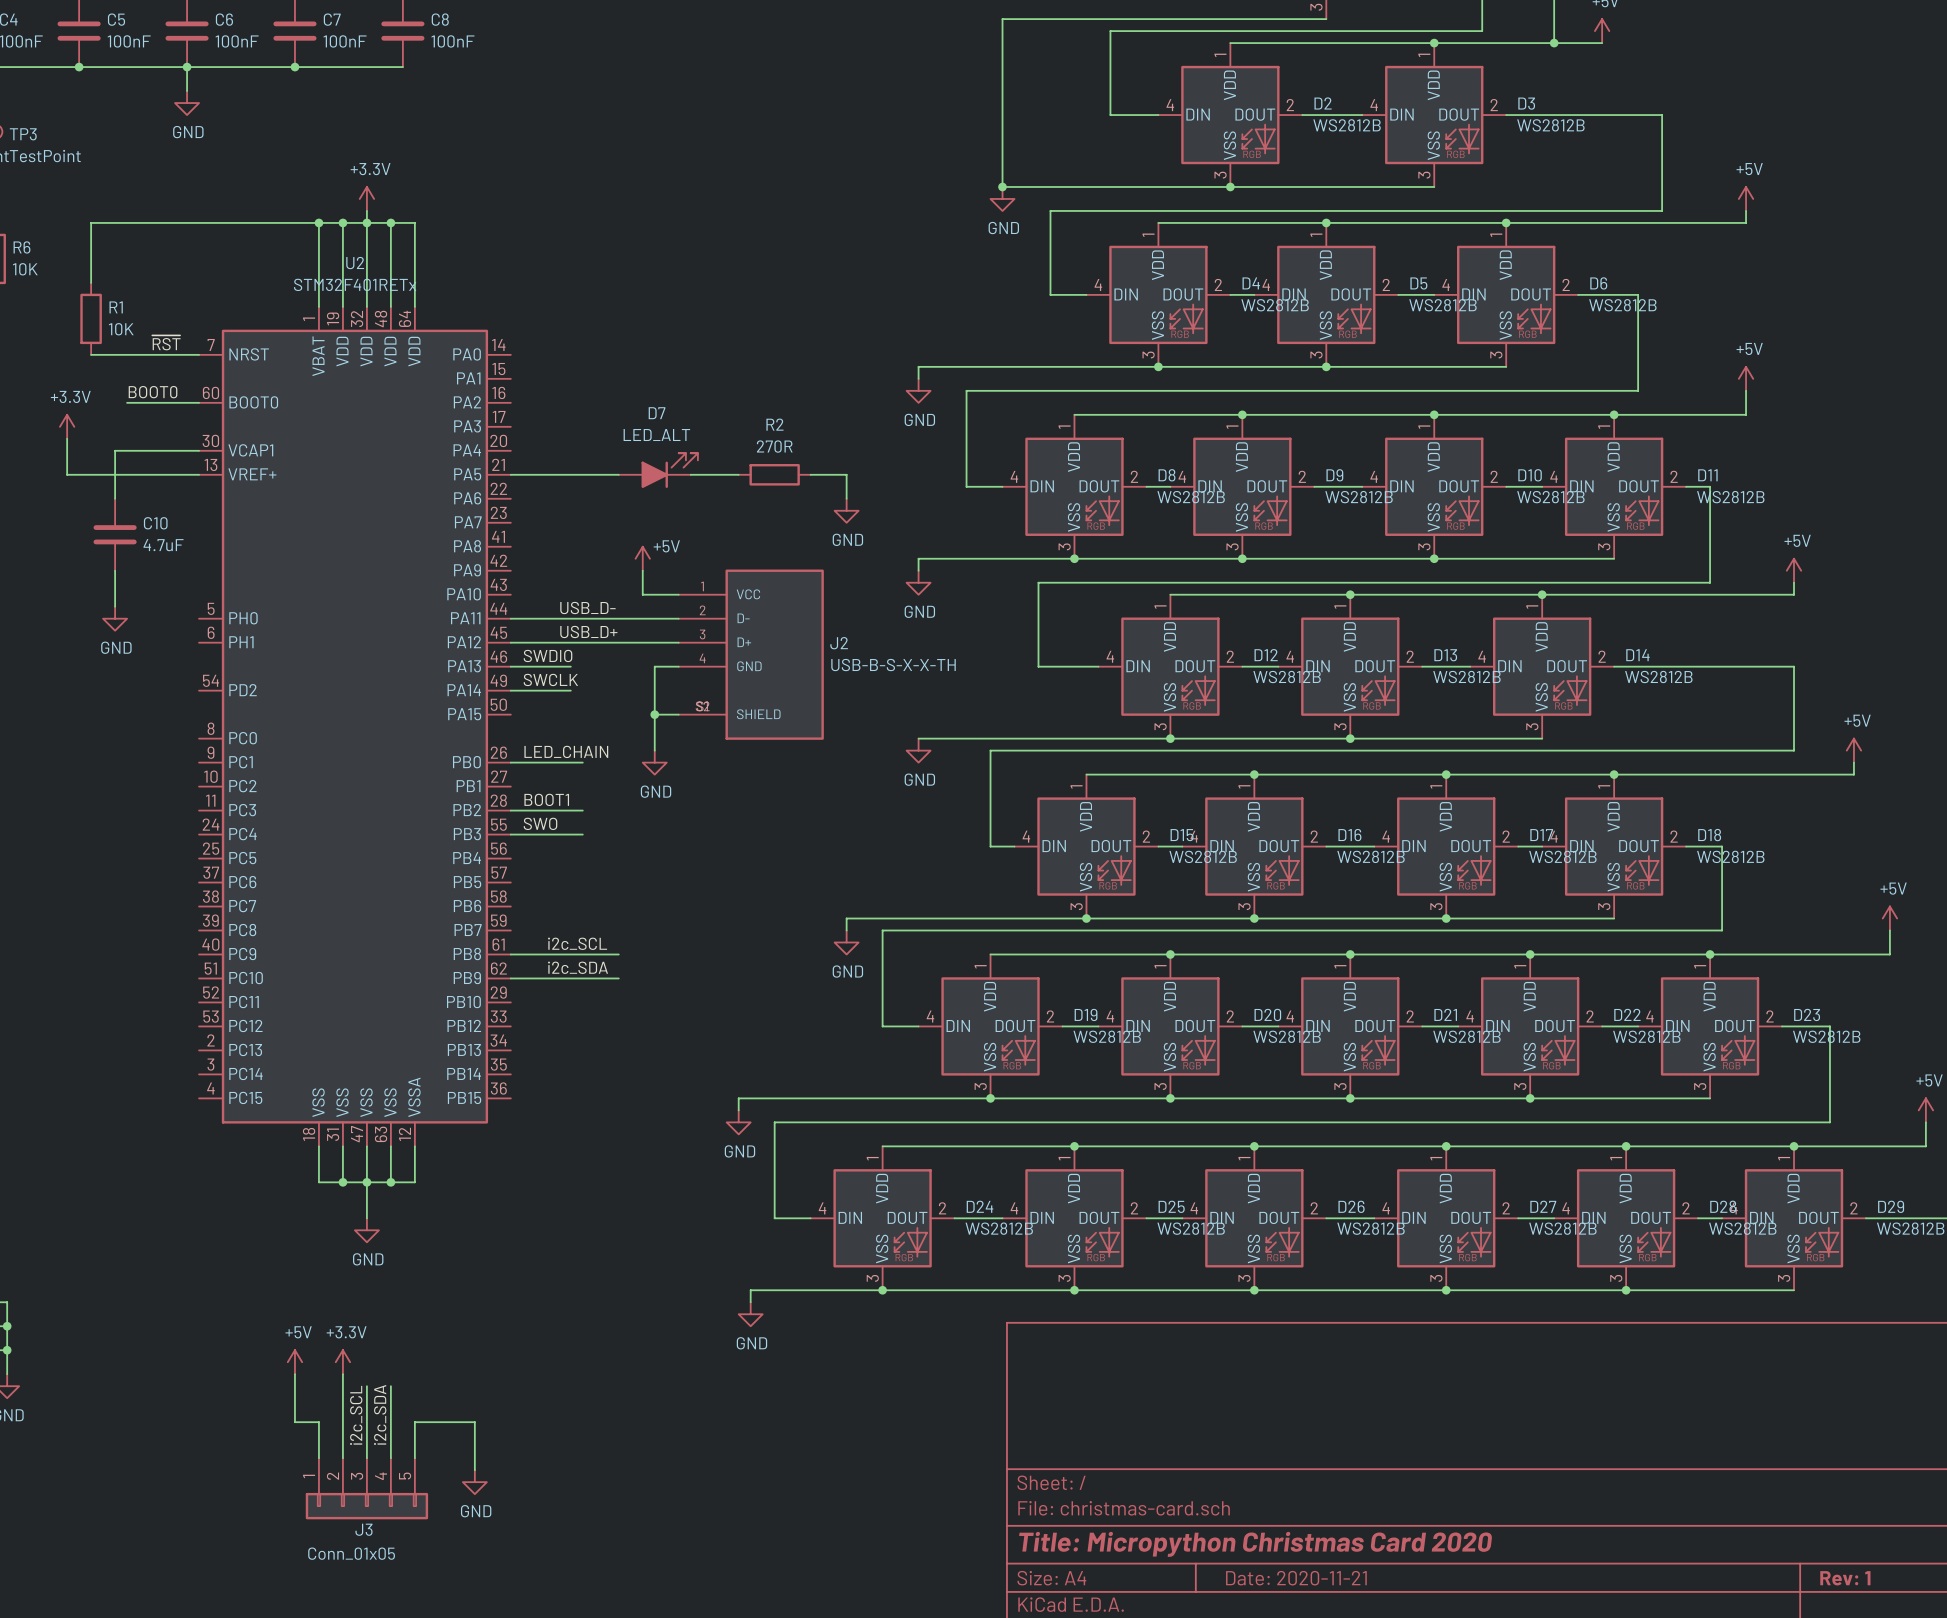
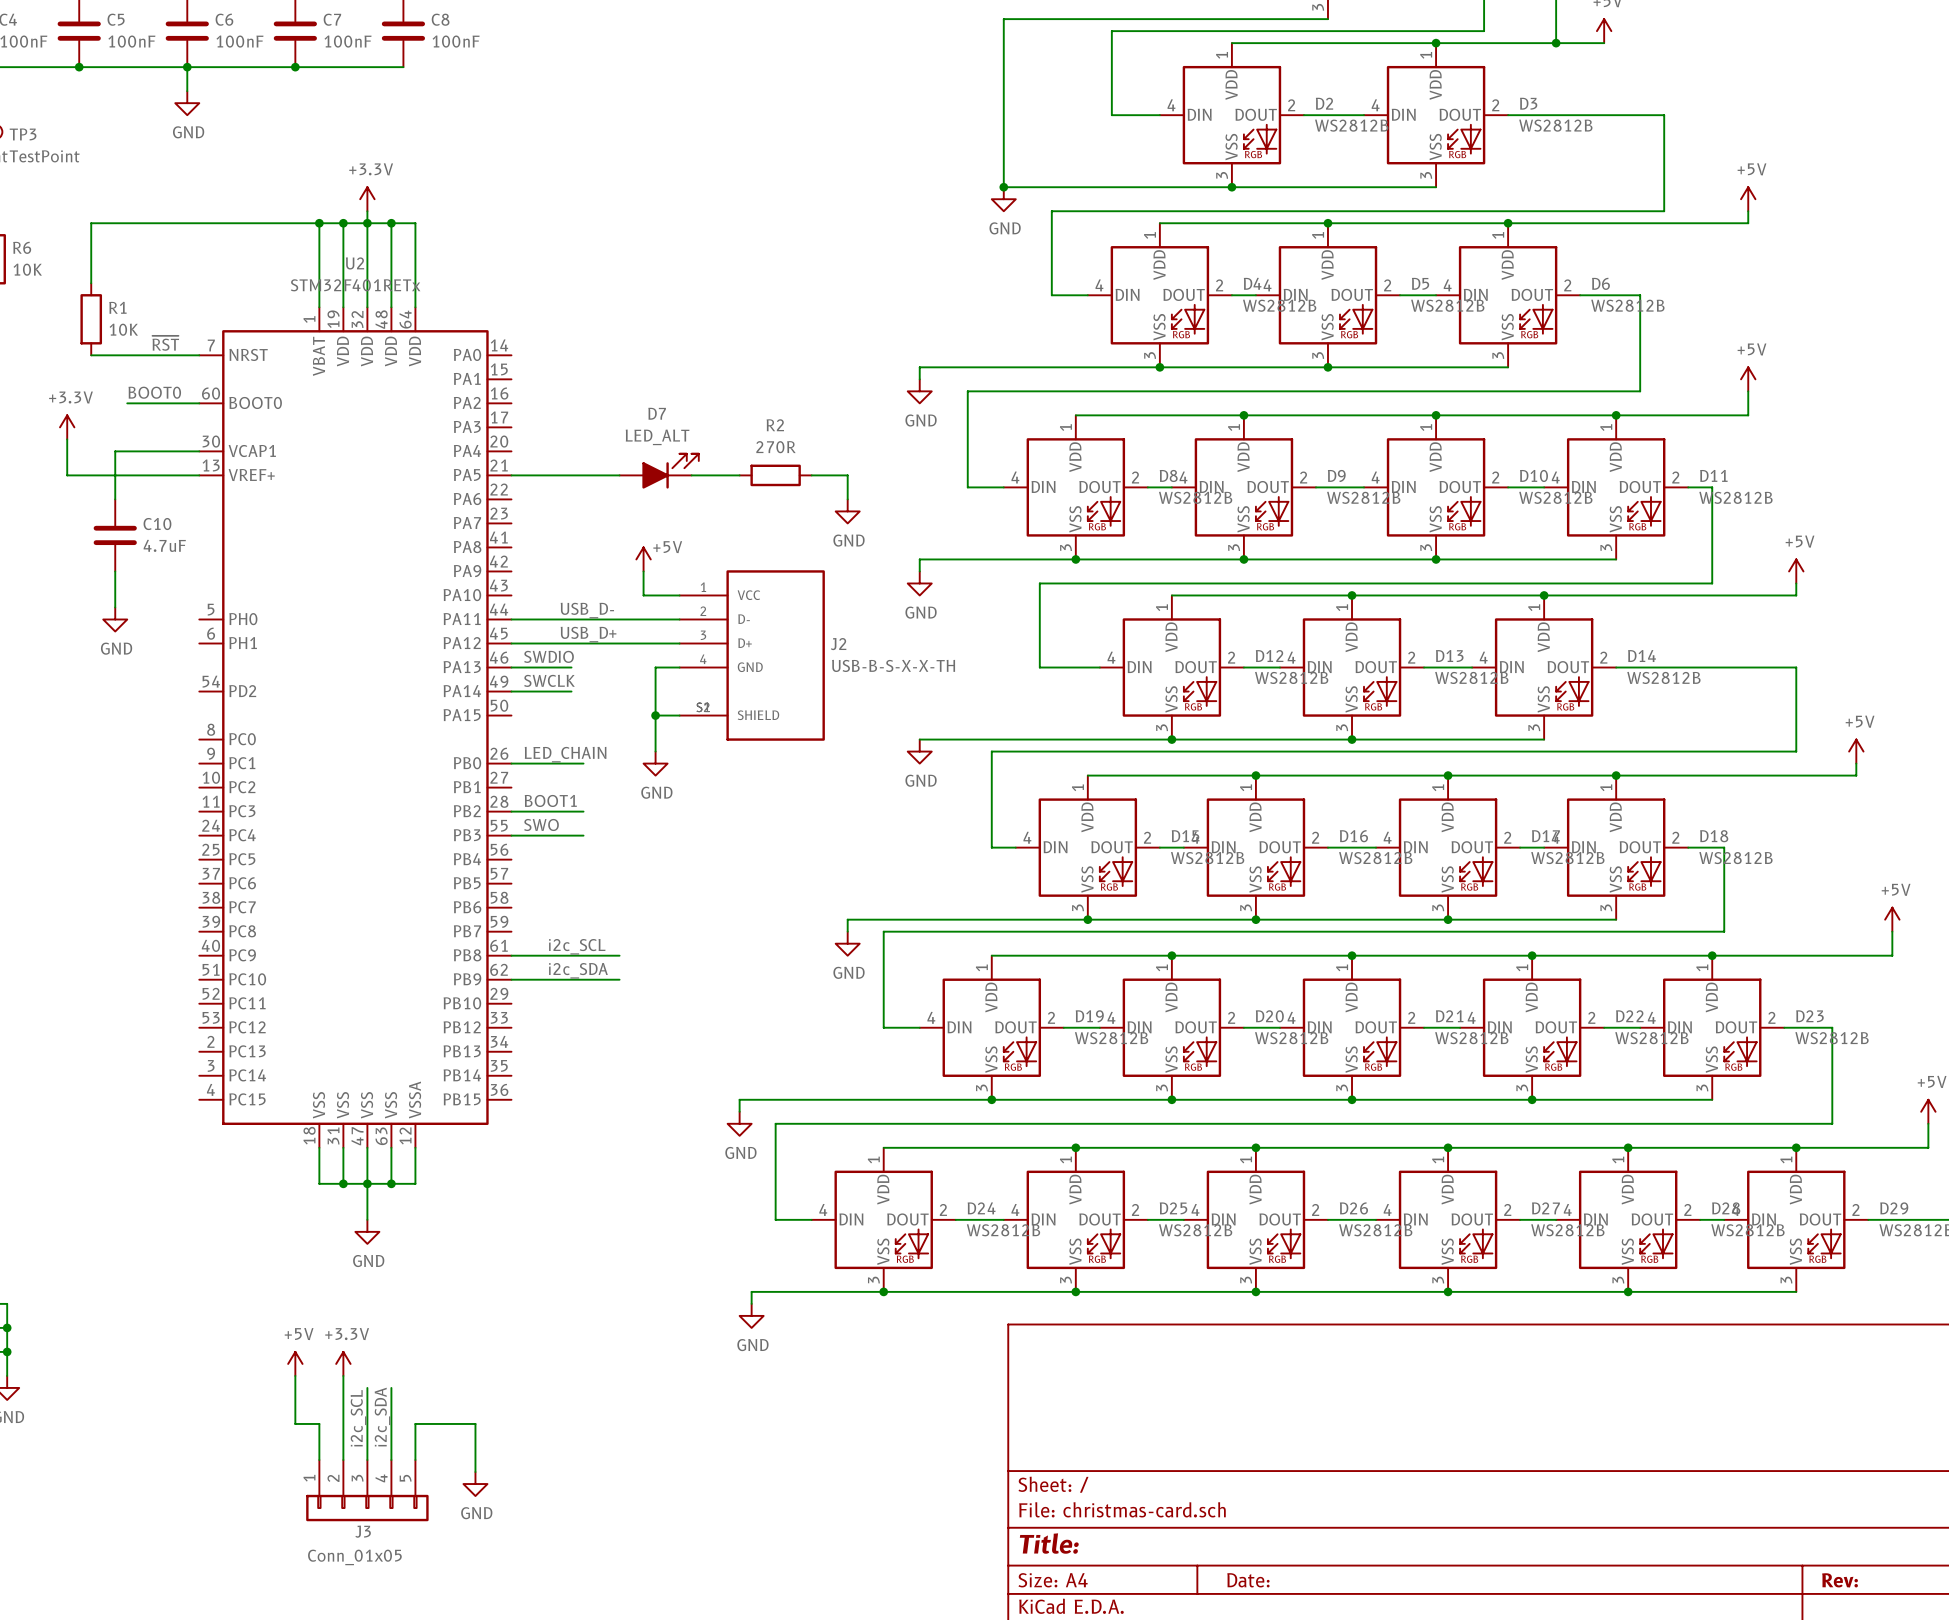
title block: Title: Micropython Christmas Card 2020 (1255, 1544) -> Title: (1049, 1543)
title block: Date: 2020-11-21 (1296, 1578) -> Date: (1248, 1580)
title block: Rev: 1 (1845, 1578) -> Rev: (1840, 1580)

